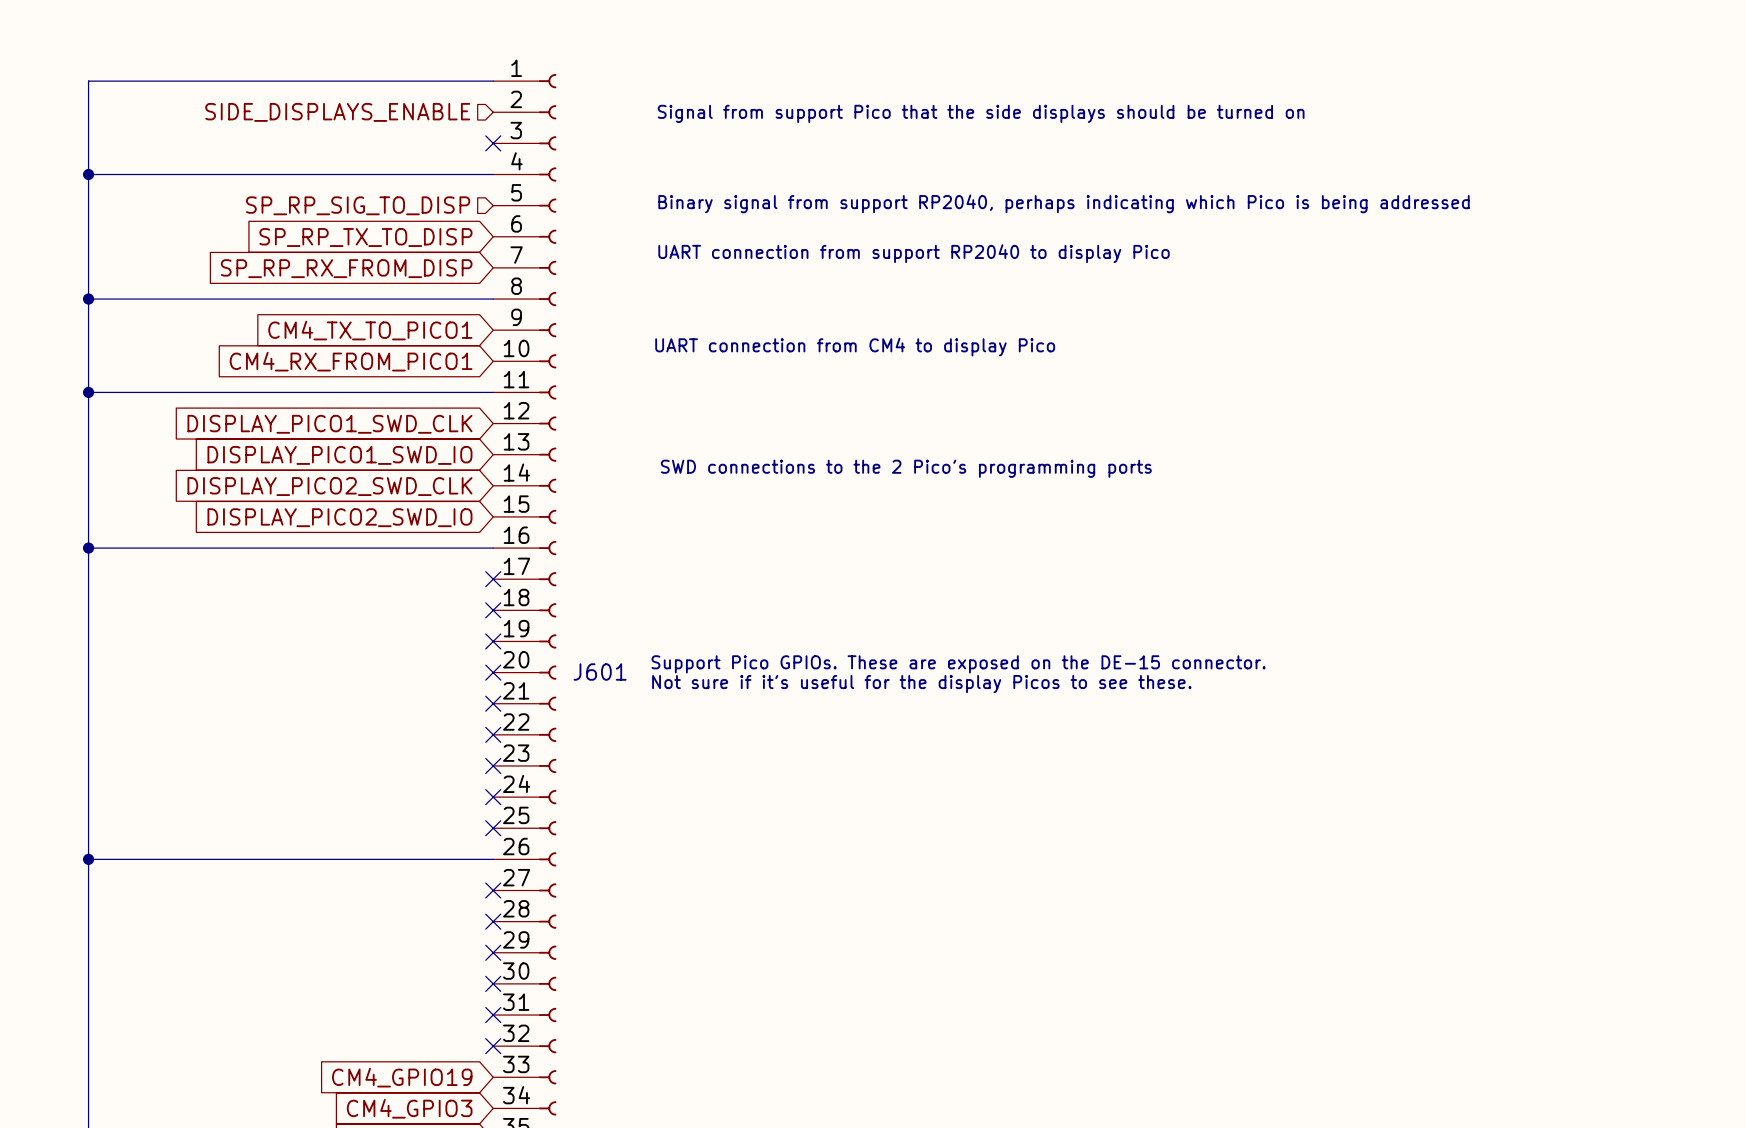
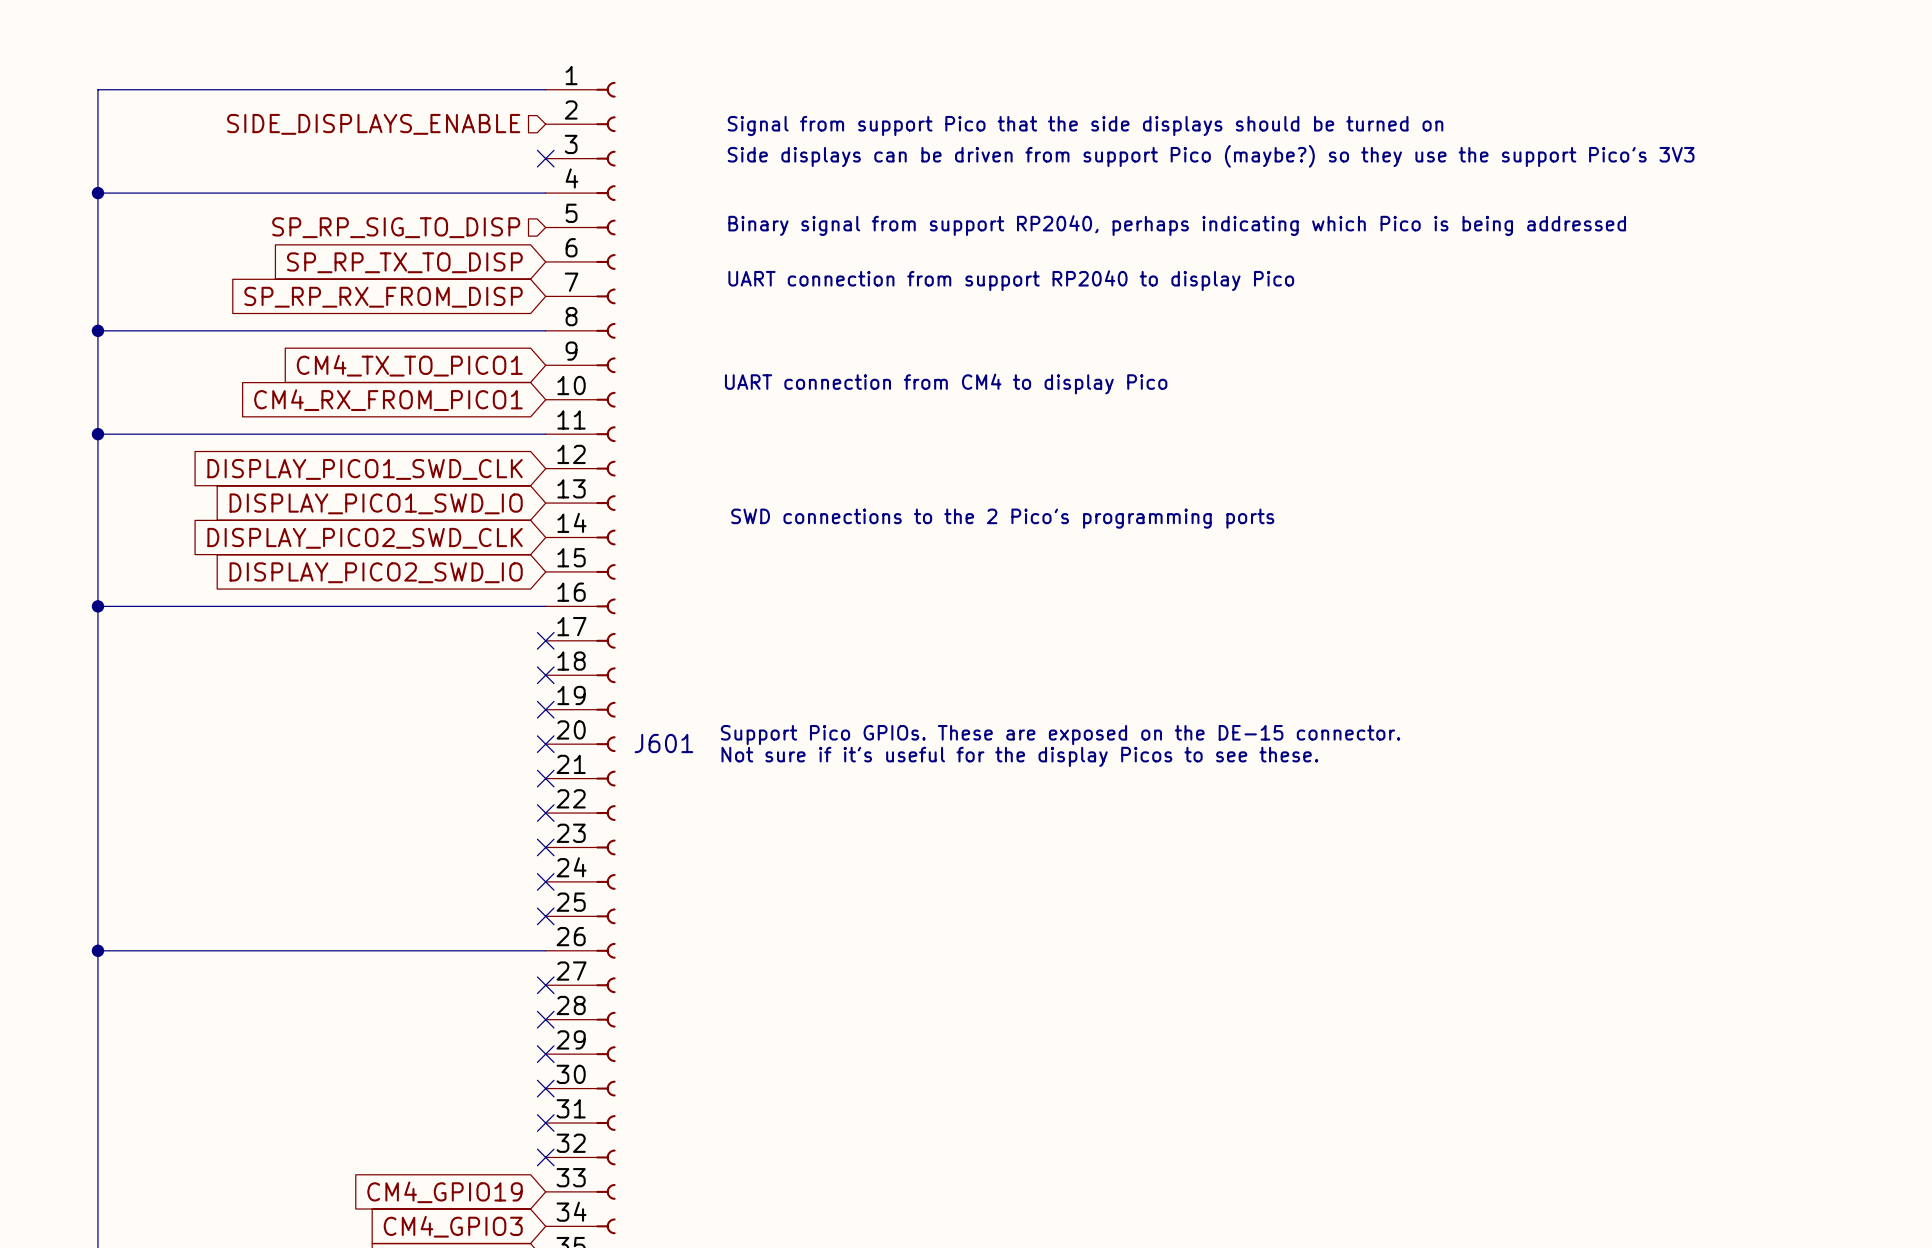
text: none -> Side displays can be driven from support Pico (maybe?) so they use the support Pico's 3V3 (1211, 156)

